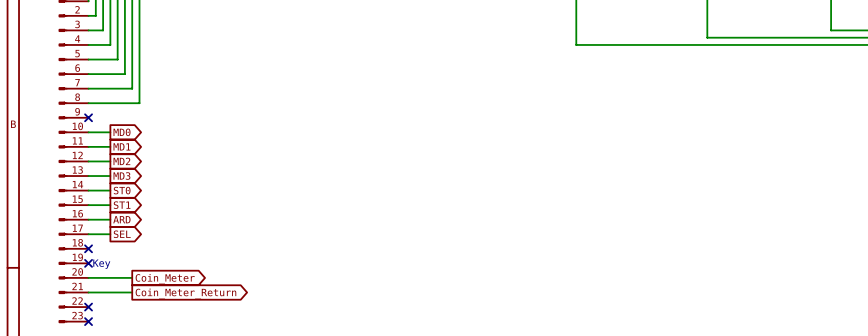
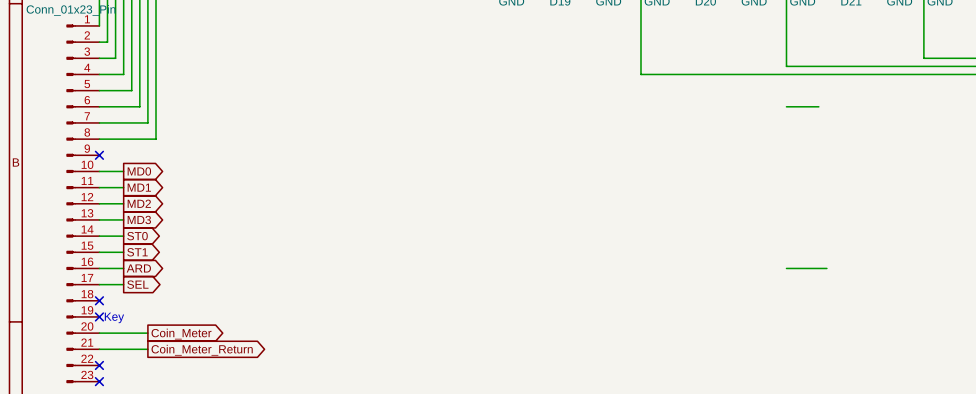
wire: none -> (786, 106) (818, 106)
wire: none -> (786, 268) (826, 268)

